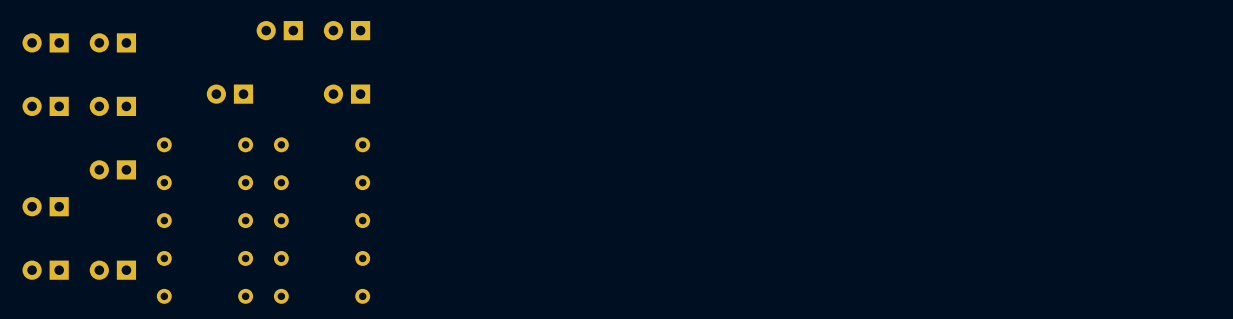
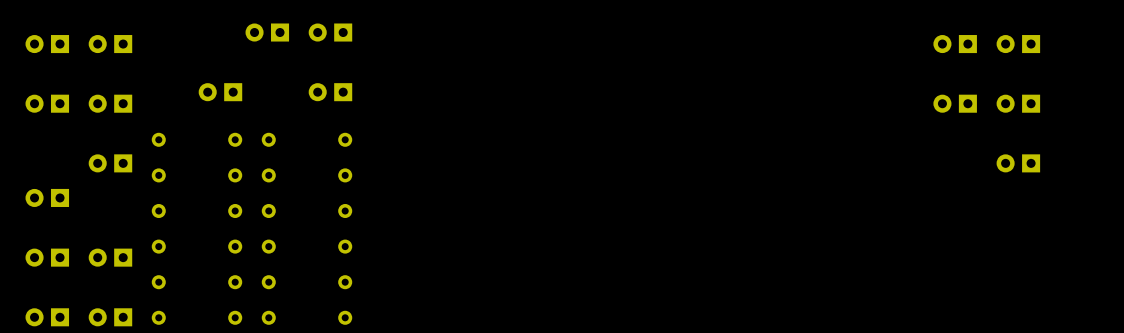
part: none -> (955, 44)
part: none -> (1018, 44)
part: none -> (955, 103)
part: none -> (1018, 103)
part: none -> (1018, 163)

